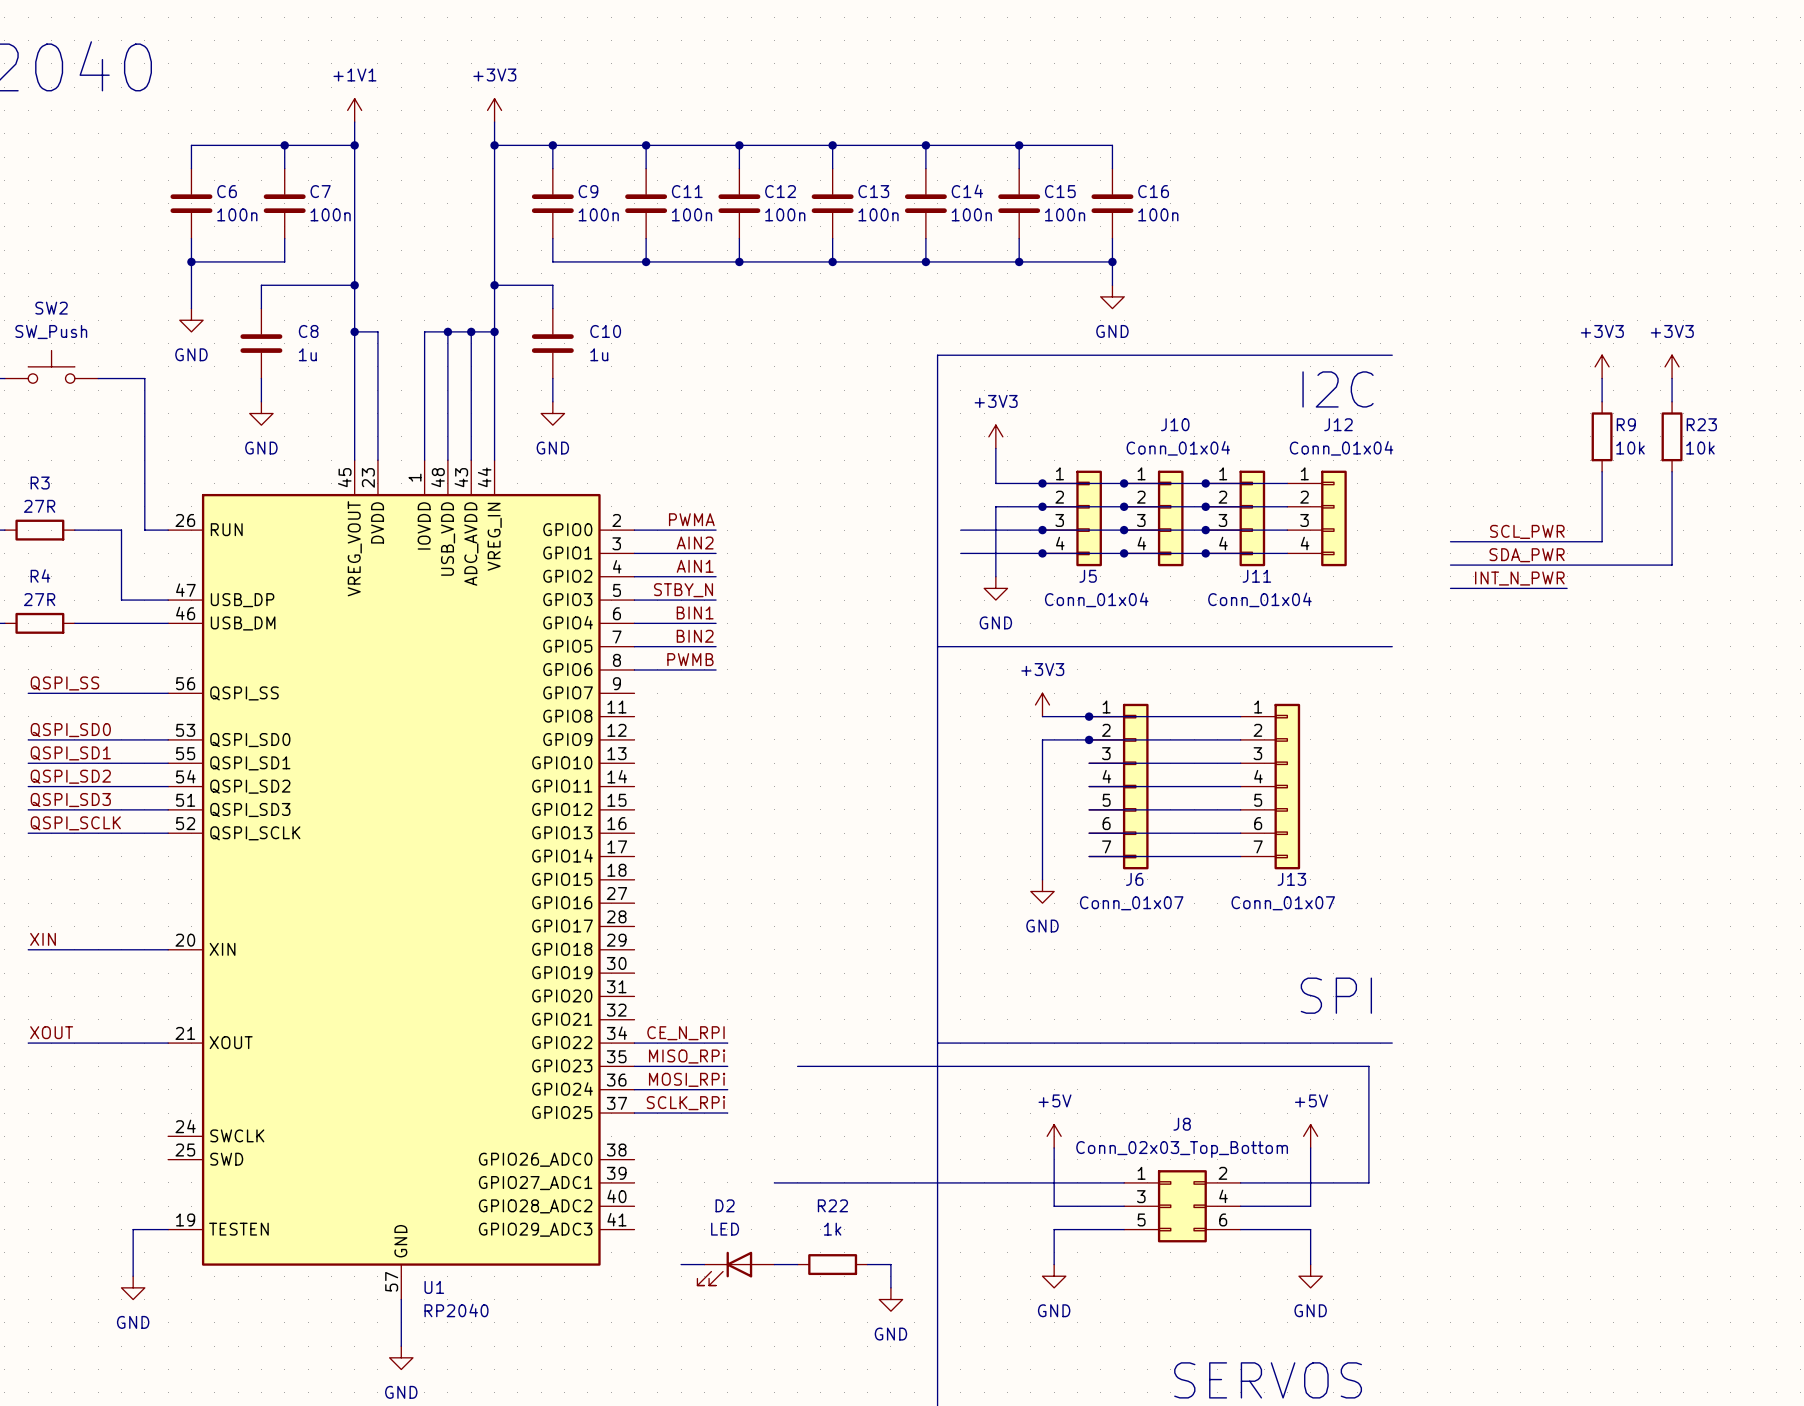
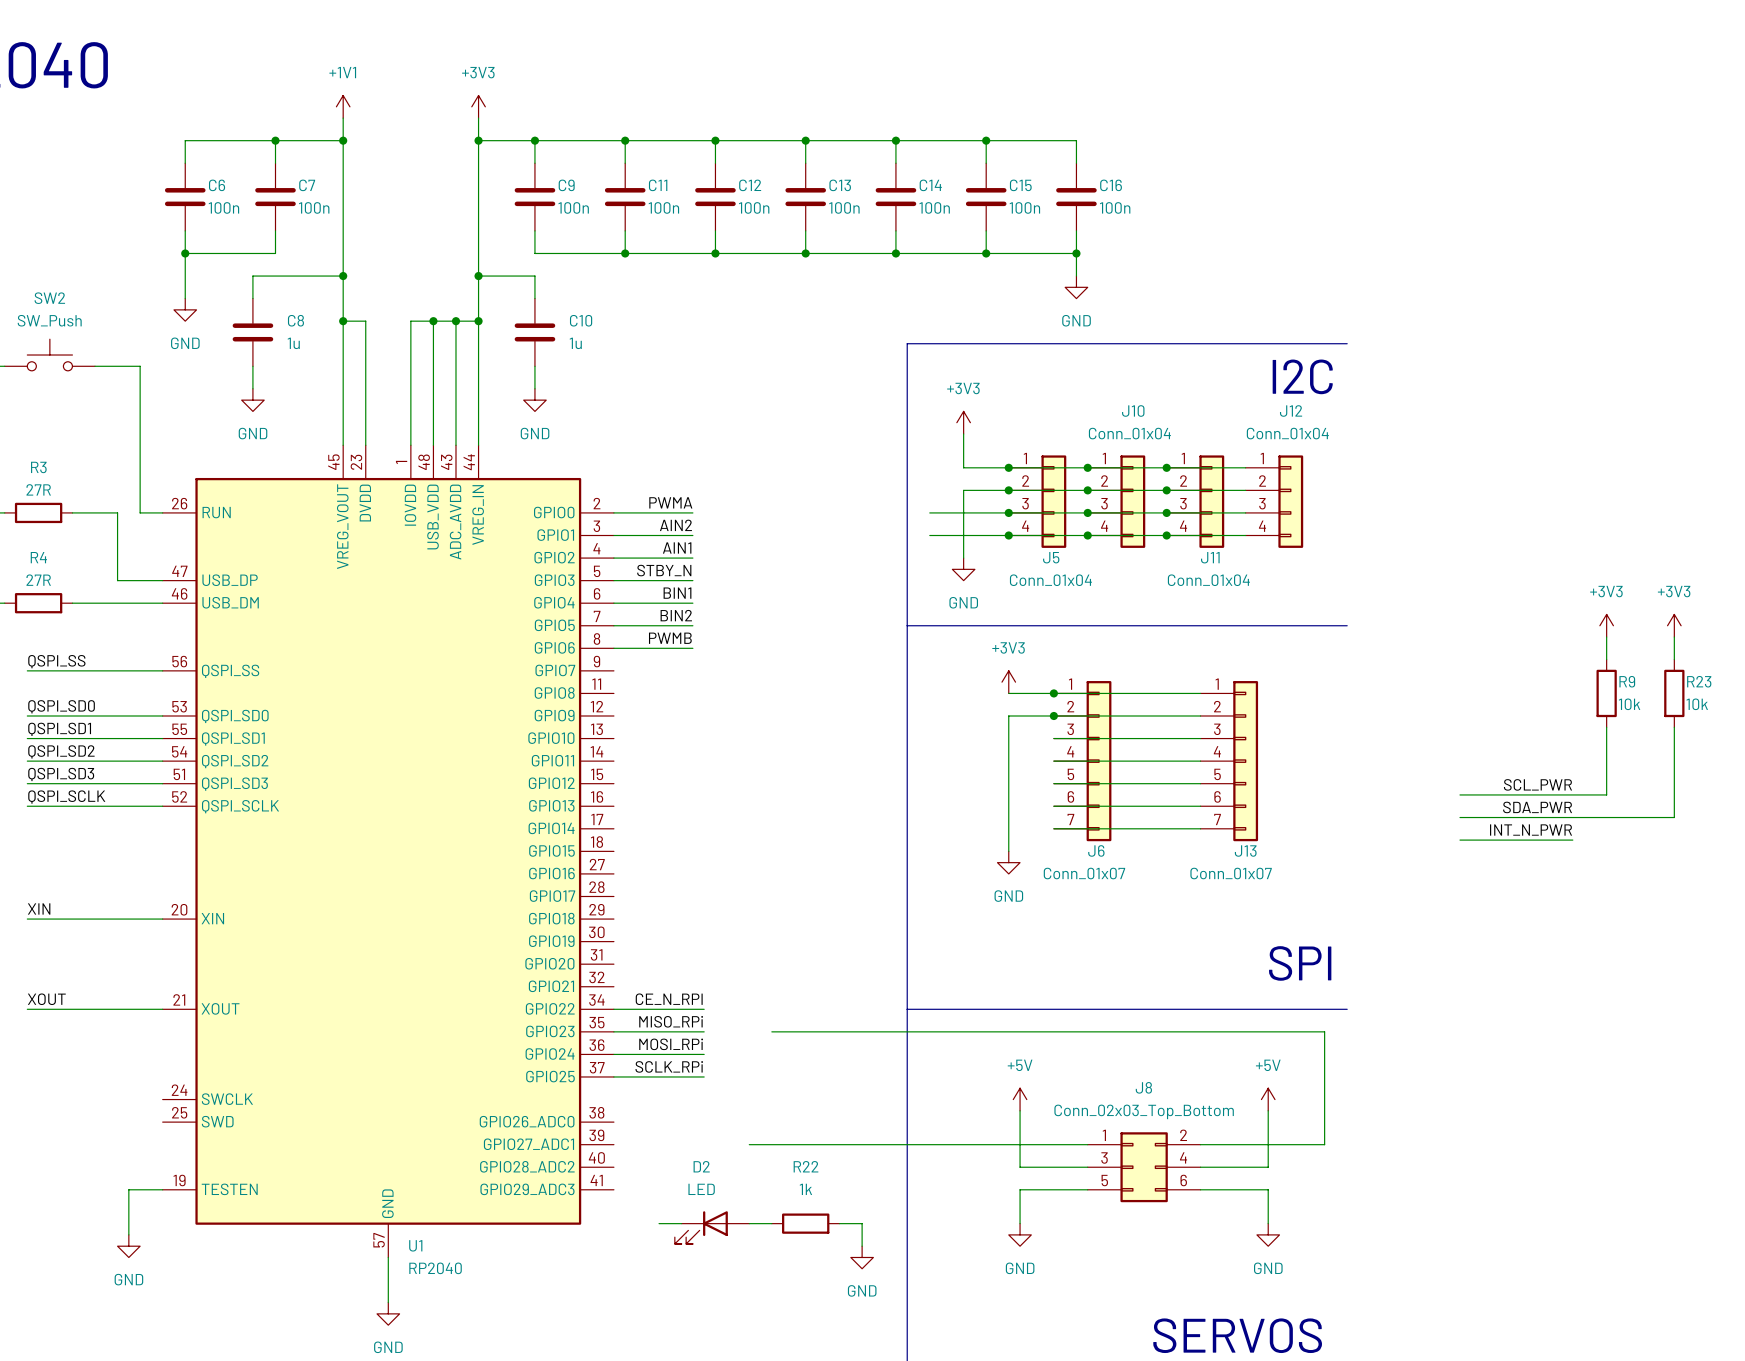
power symbol: +3V3 (1602, 366) -> none
power symbol: +3V3 (1672, 366) -> none
wire: (1602, 378) (1602, 401) -> none
wire: (1672, 378) (1672, 401) -> none
R9 position: (1602, 436) -> (1606, 693)
R23 position: (1672, 436) -> (1674, 693)
wire: (1602, 471) (1602, 541) (1450, 541) -> none
wire: (1672, 471) (1672, 565) (1450, 565) -> none
label: SCL_PWR (1527, 531) -> none
label: SDA_PWR (1527, 555) -> none
label: INT_N_PWR (1519, 578) -> none
wire: (1450, 588) (1567, 588) -> none
power symbol: none -> +3V3 (1606, 625)
power symbol: none -> +3V3 (1674, 625)
wire: none -> (1606, 637) (1606, 659)
wire: none -> (1674, 637) (1674, 659)
wire: none -> (1606, 727) (1606, 794) (1459, 794)
wire: none -> (1674, 727) (1674, 817) (1459, 817)
label: none -> SCL_PWR (1537, 784)
label: none -> SDA_PWR (1537, 807)
label: none -> INT_N_PWR (1531, 830)
wire: none -> (1459, 840) (1572, 840)

